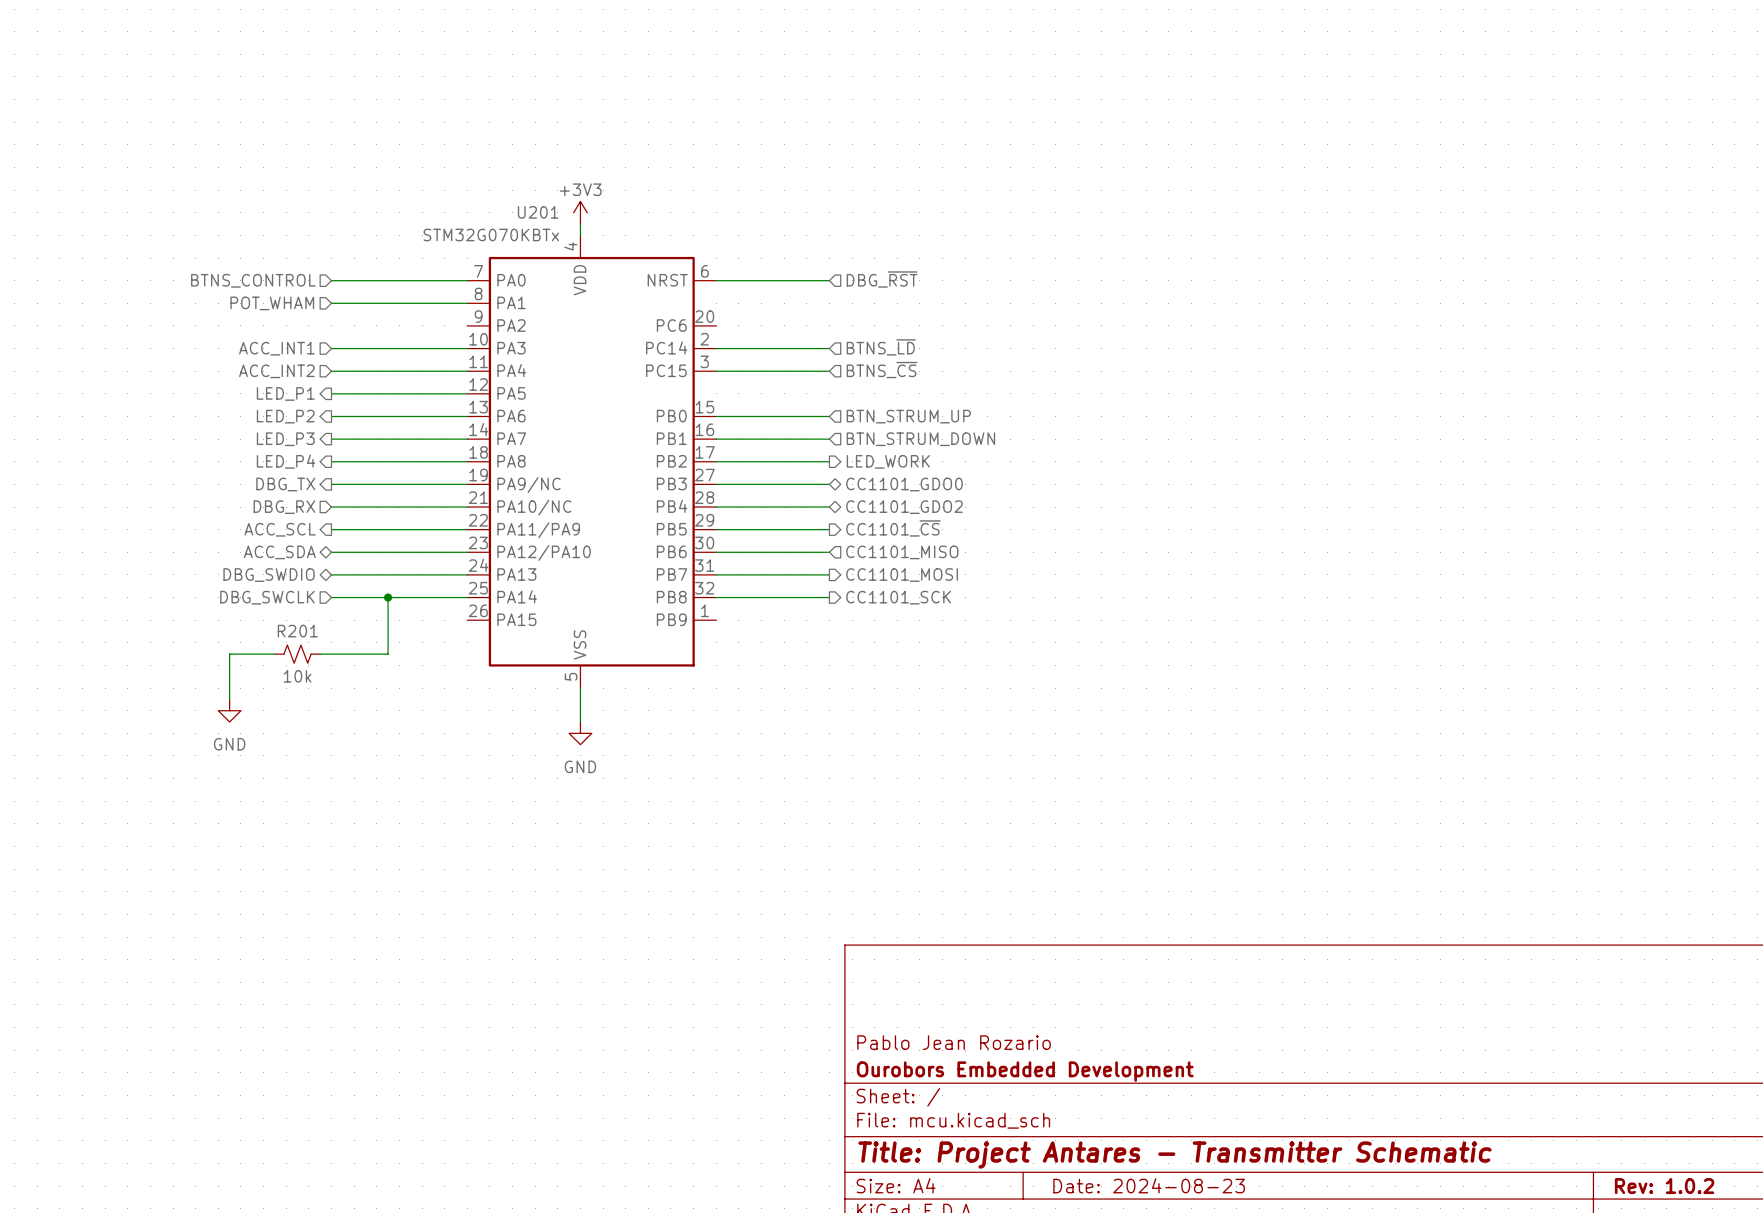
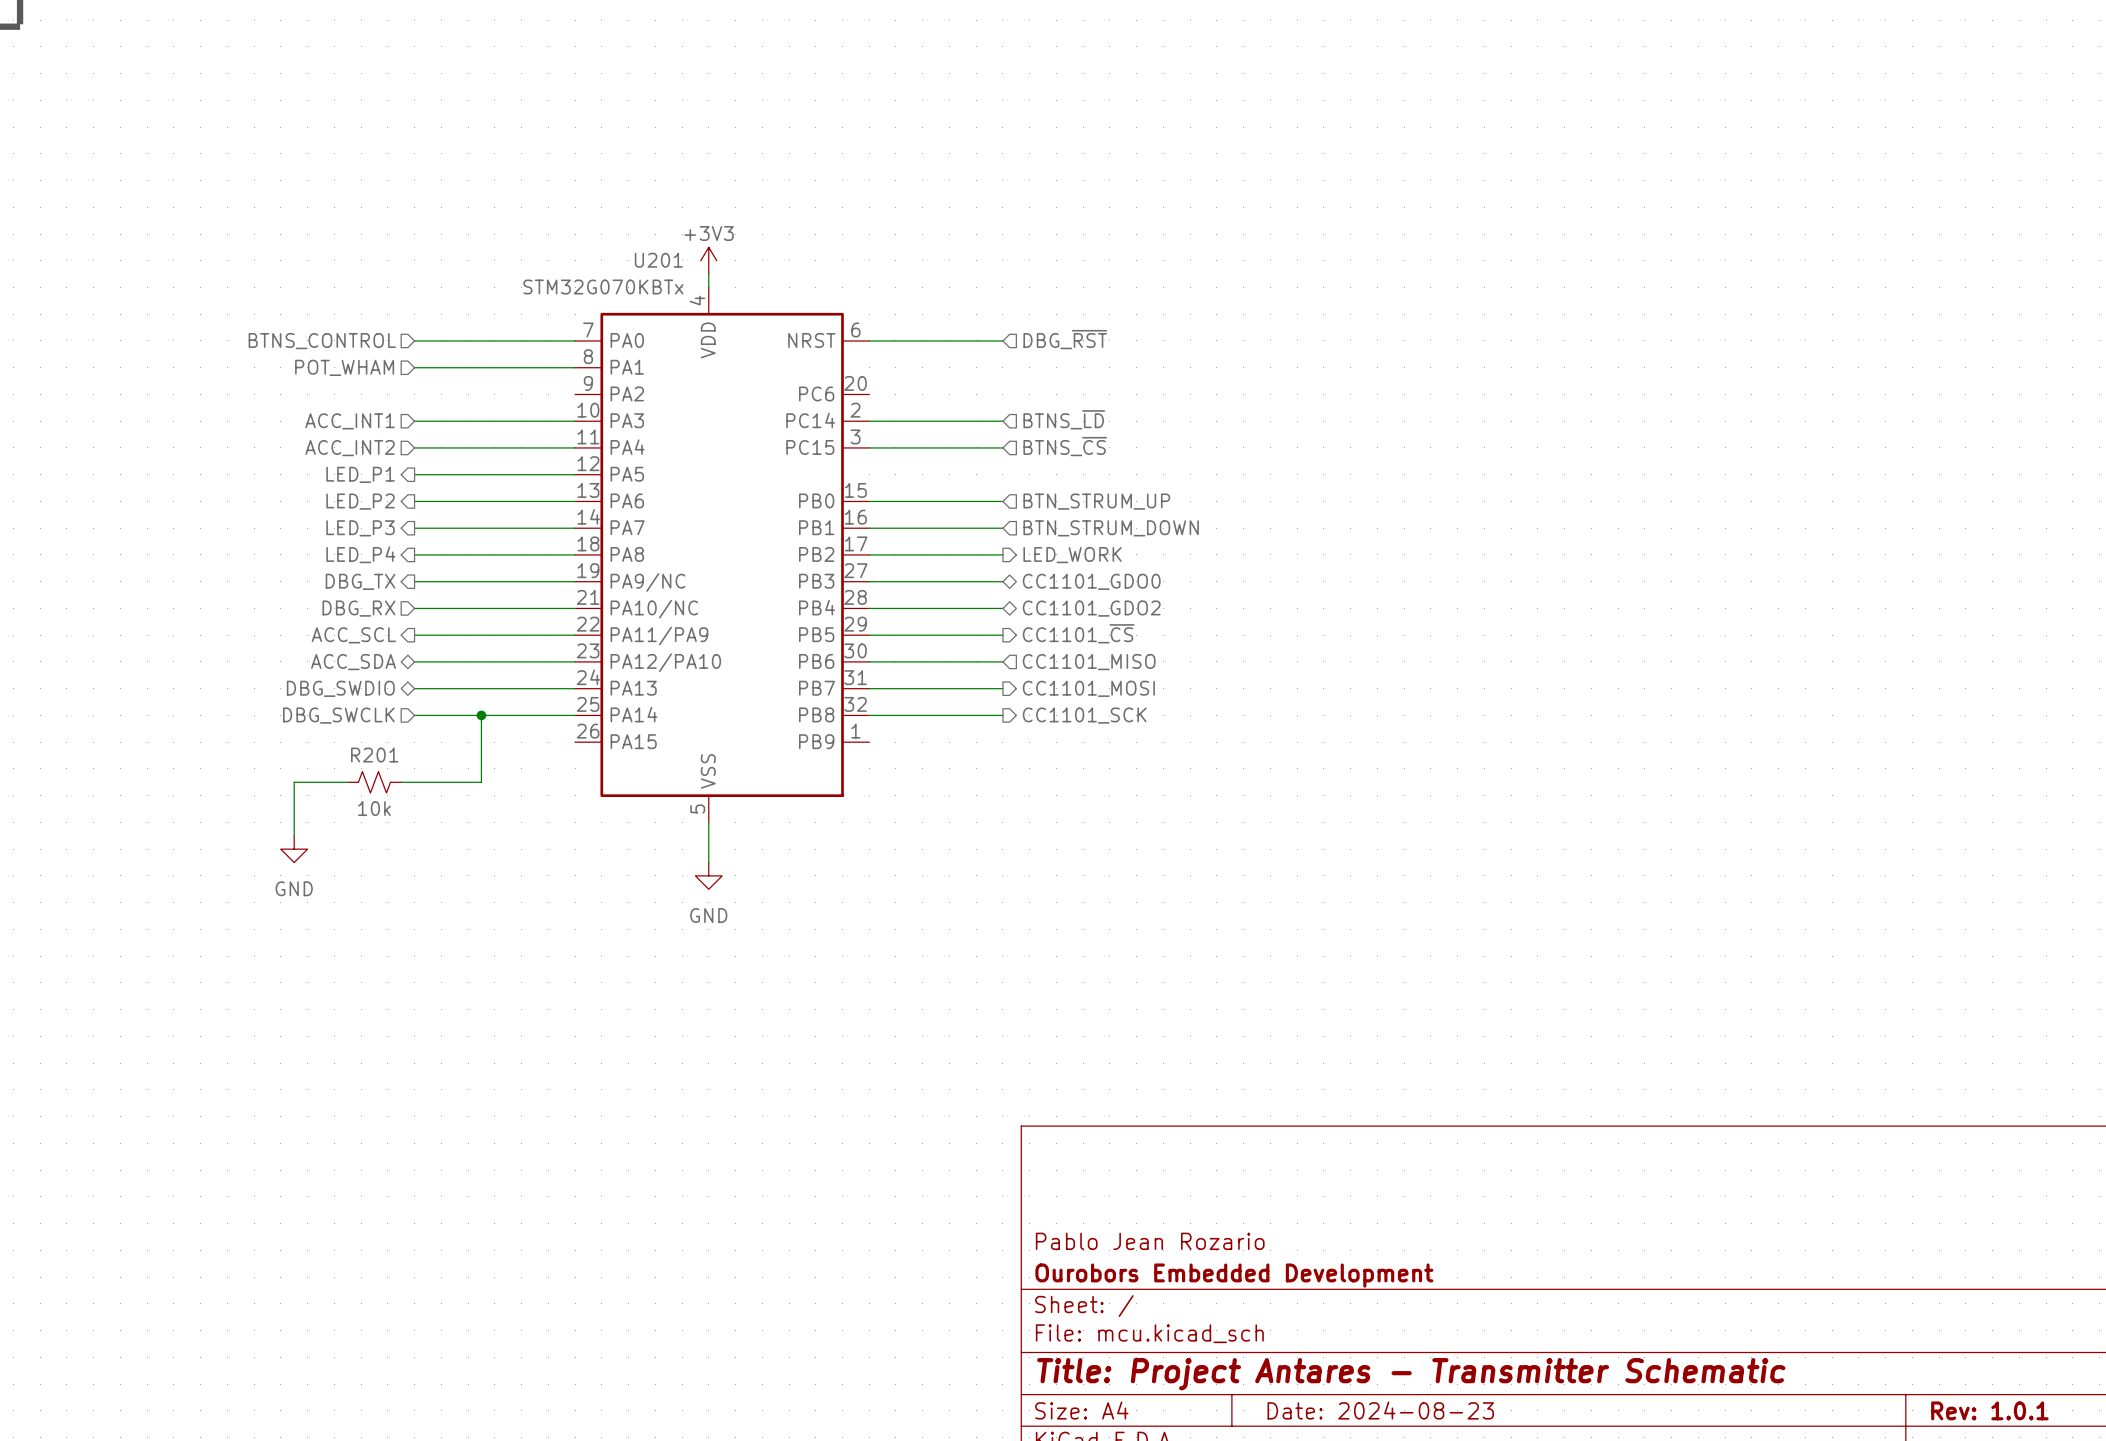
title block: Rev: 1.0.2 (1664, 1186) -> Rev: 1.0.1 (1989, 1410)

